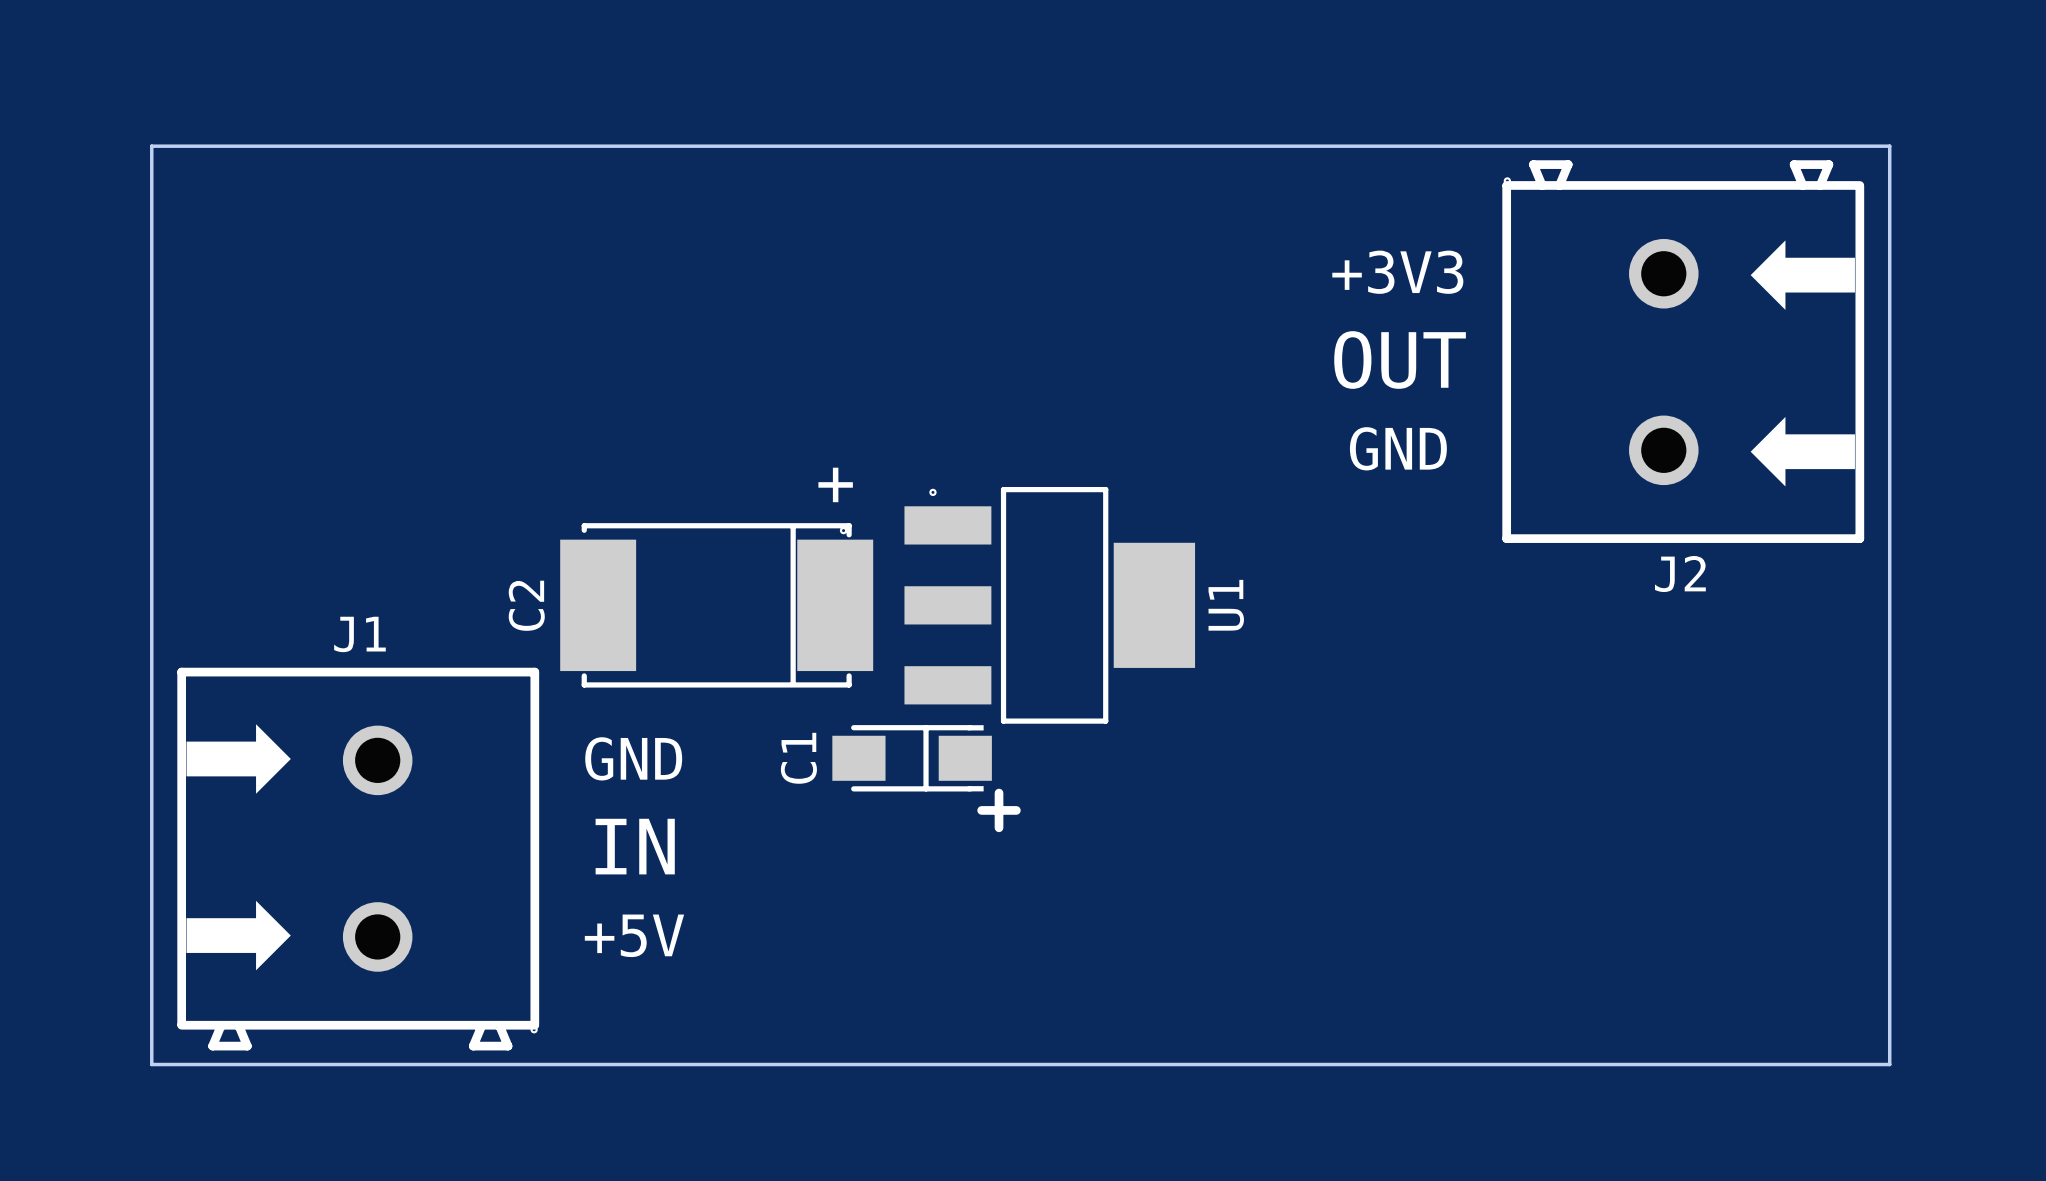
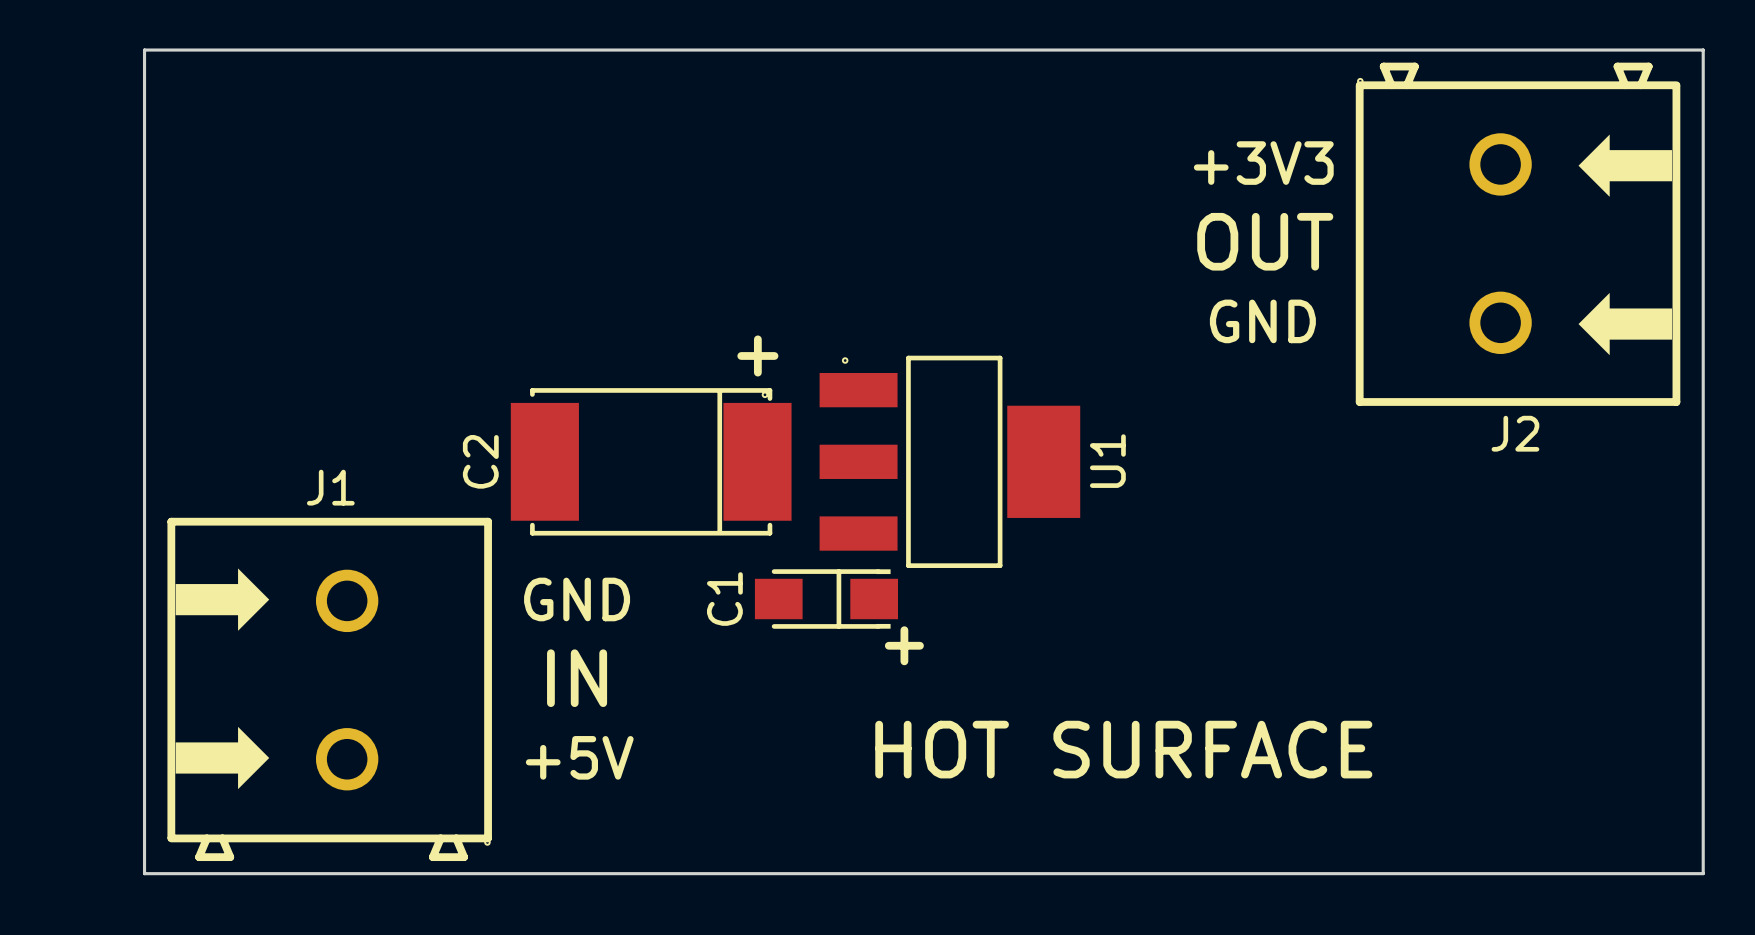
text: none -> HOT SURFACE (1123, 749)

